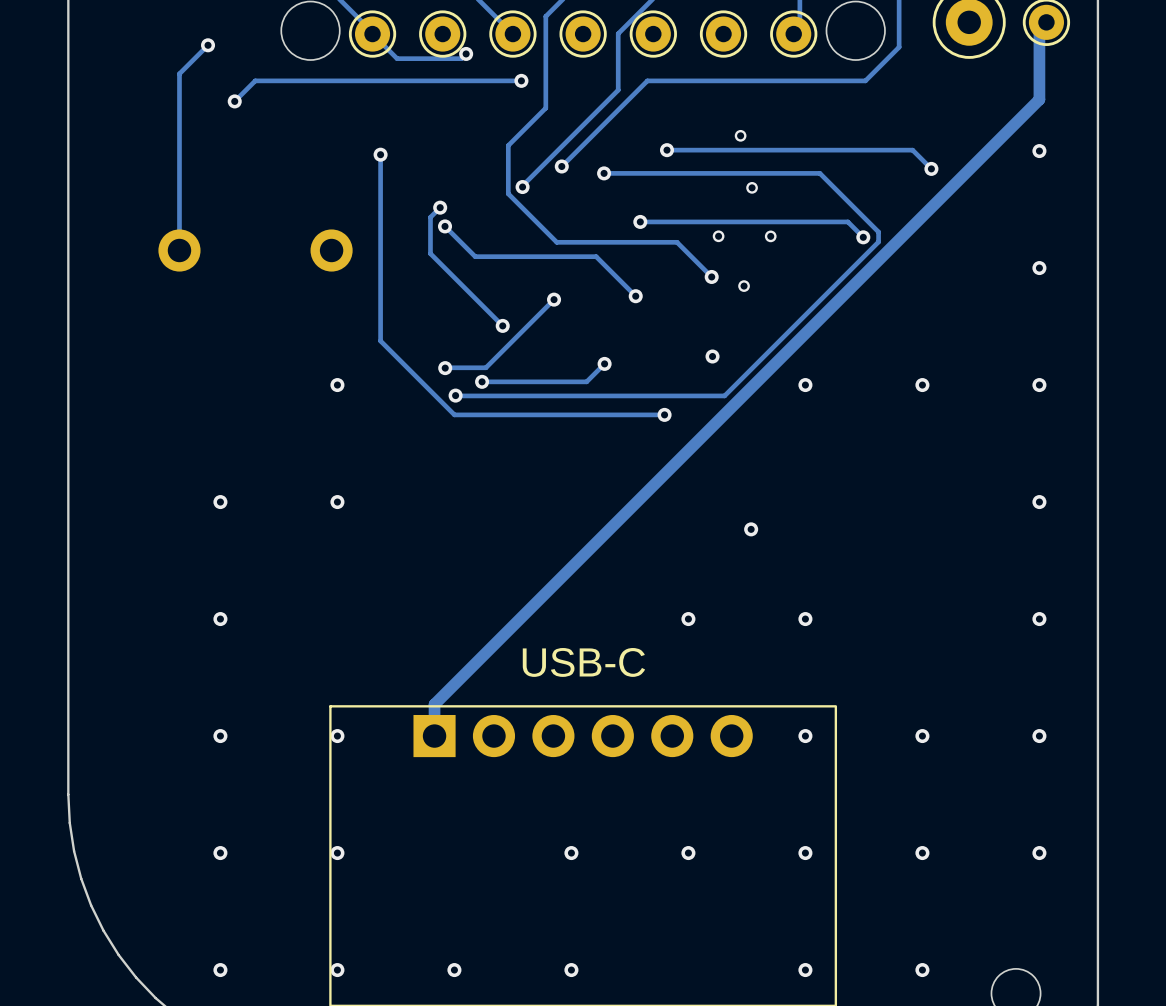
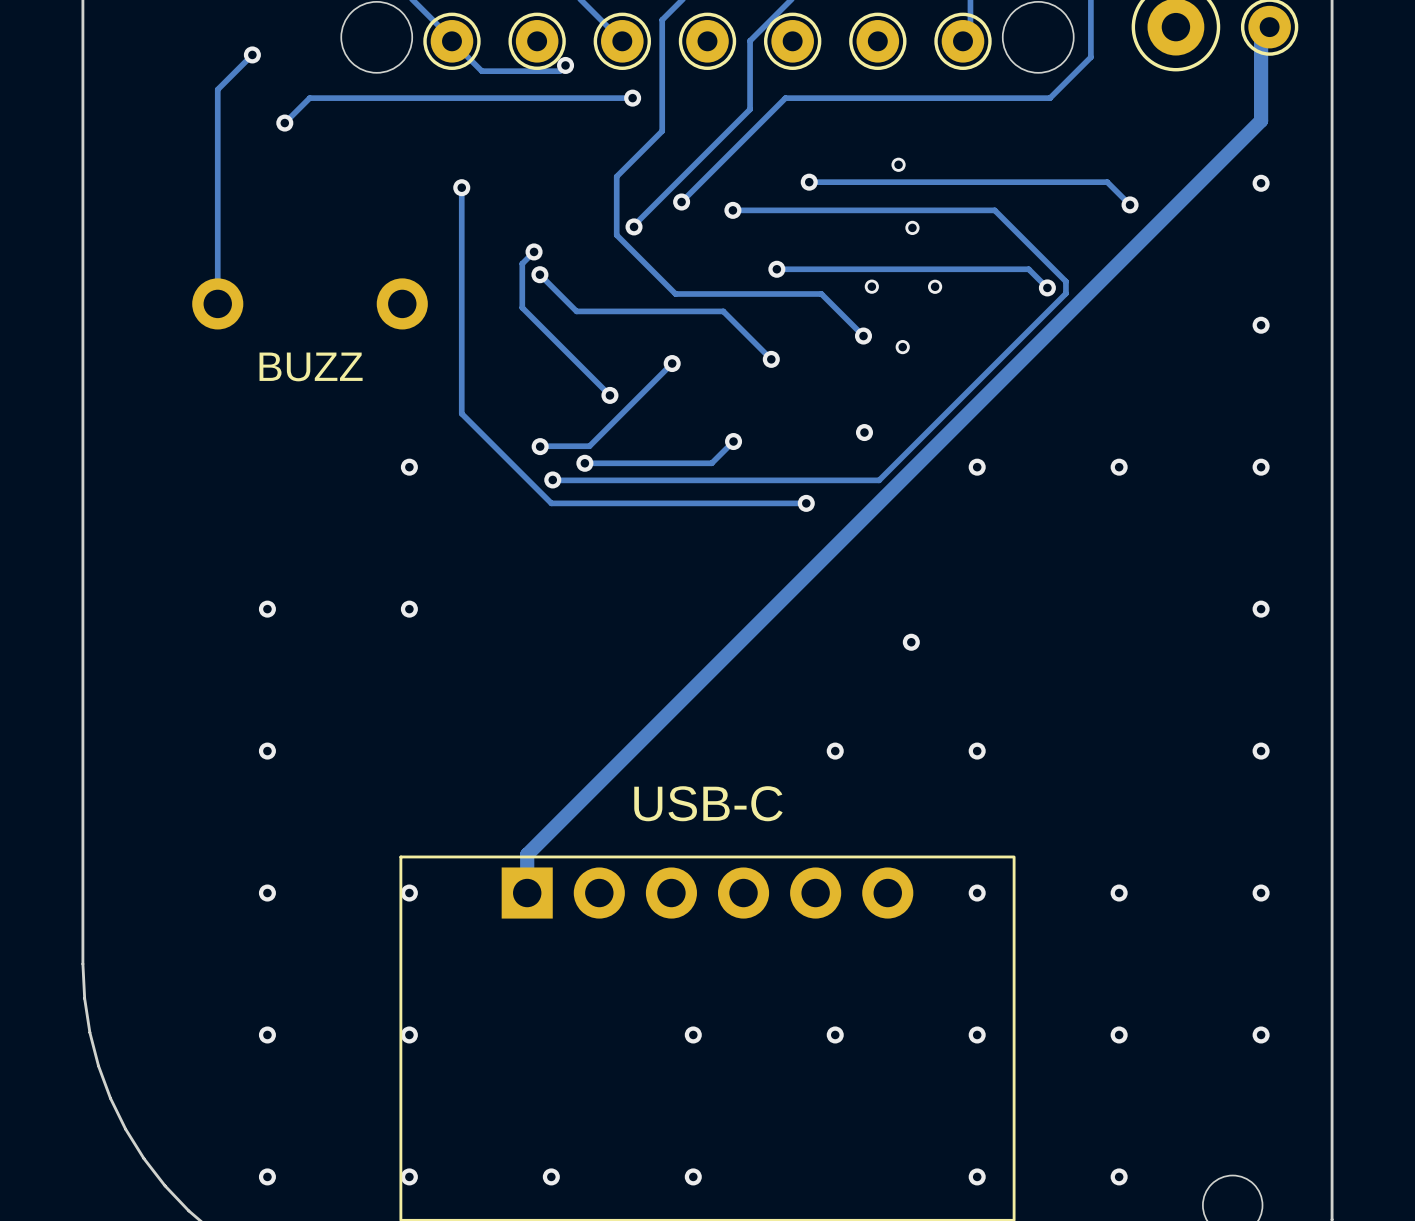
text: none -> BUZZ (311, 366)

